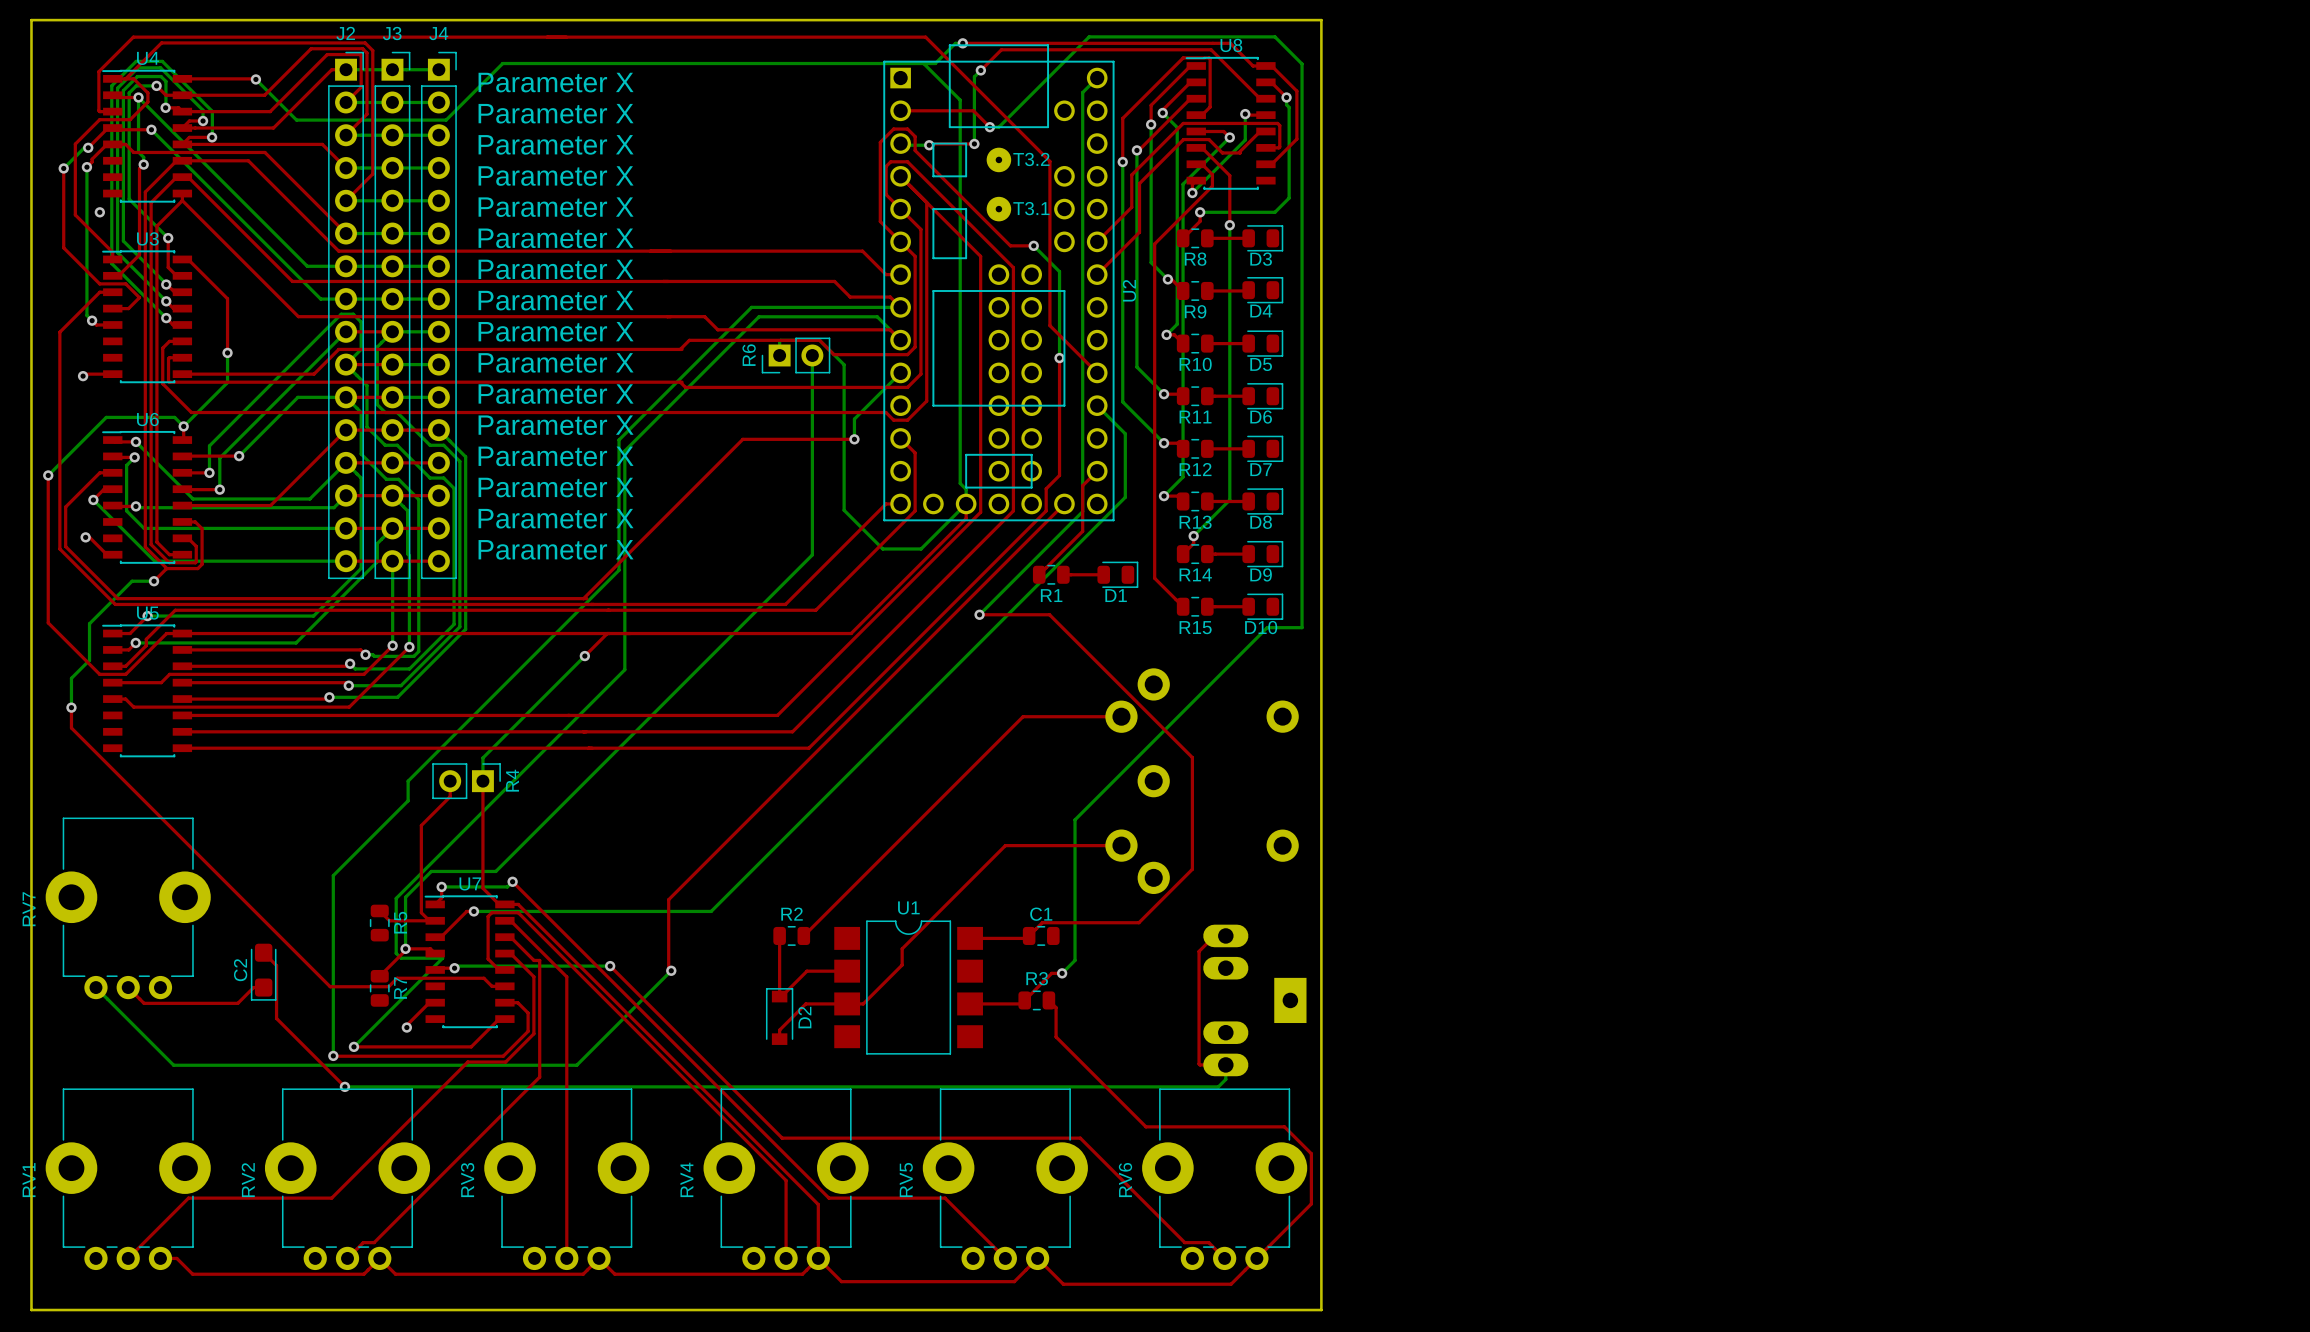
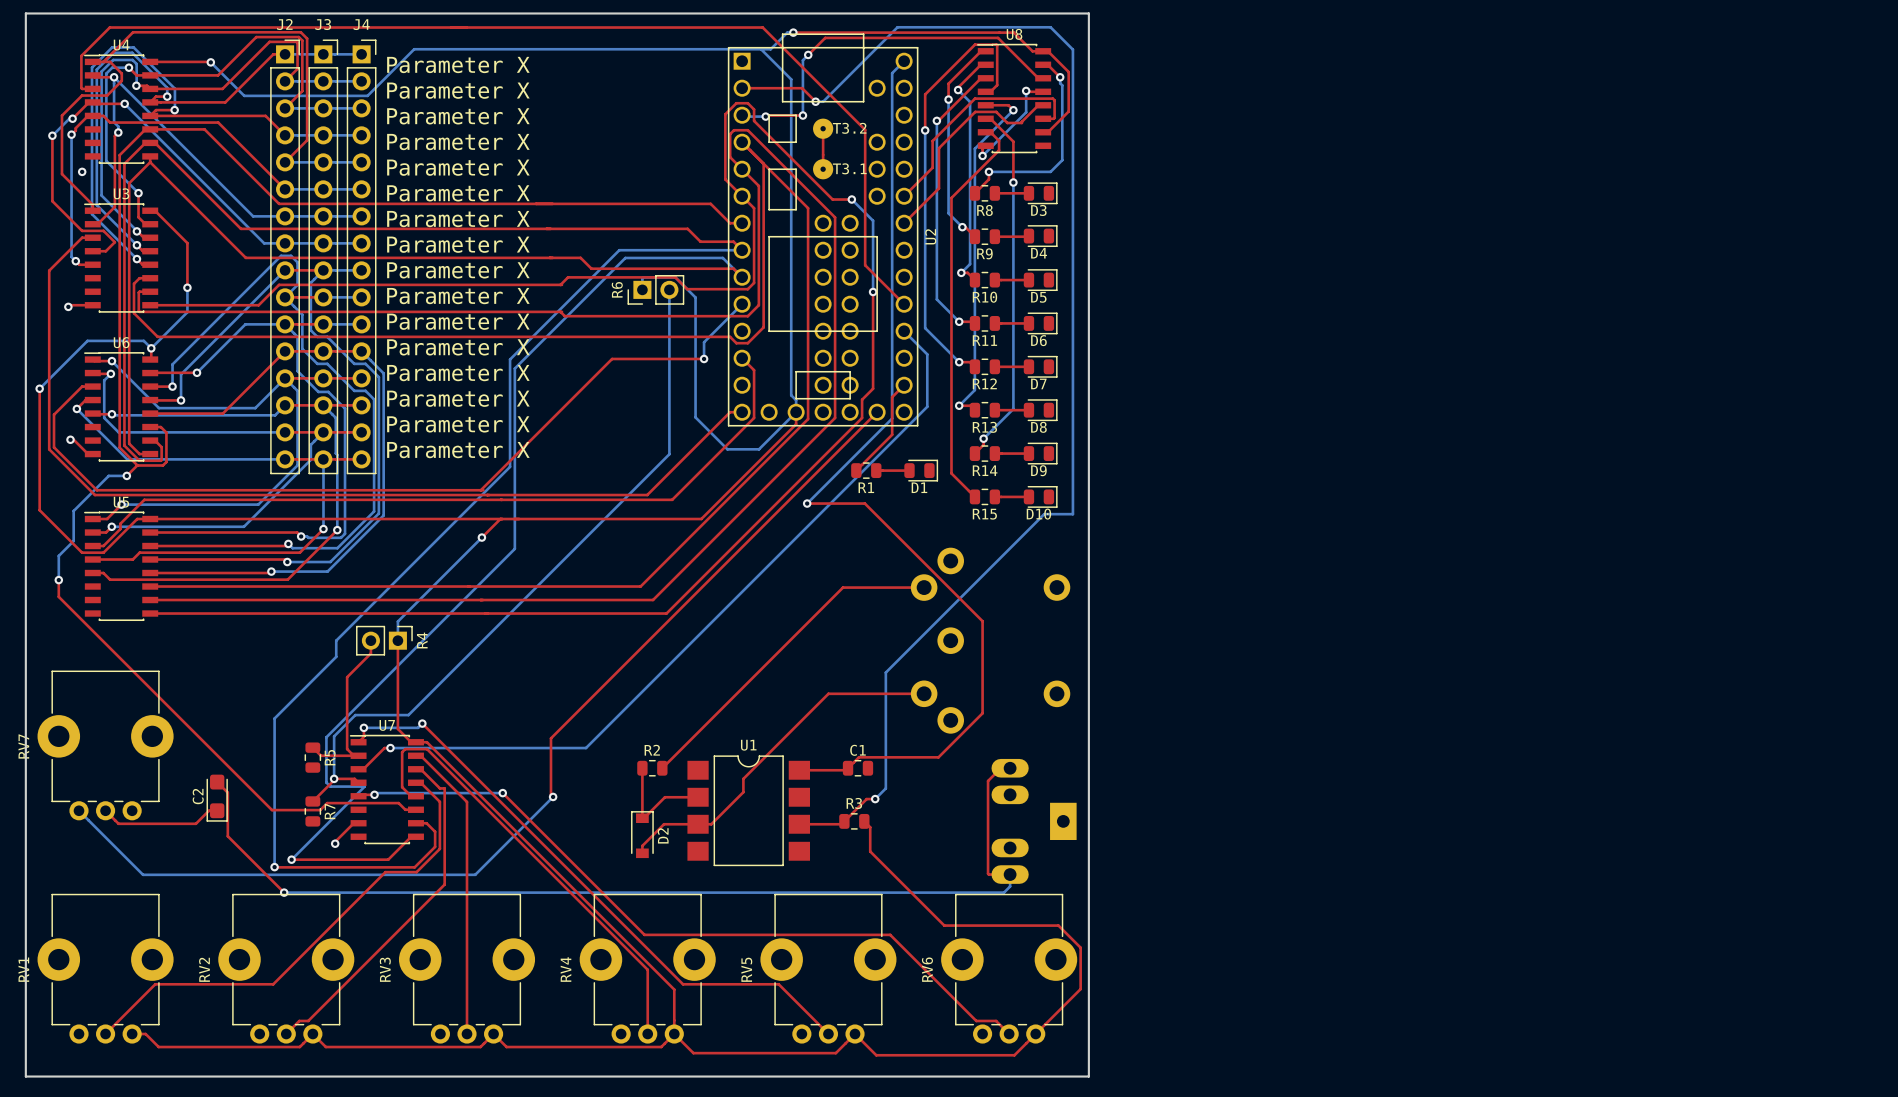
top track: none -> (823, 128) (823, 169)

